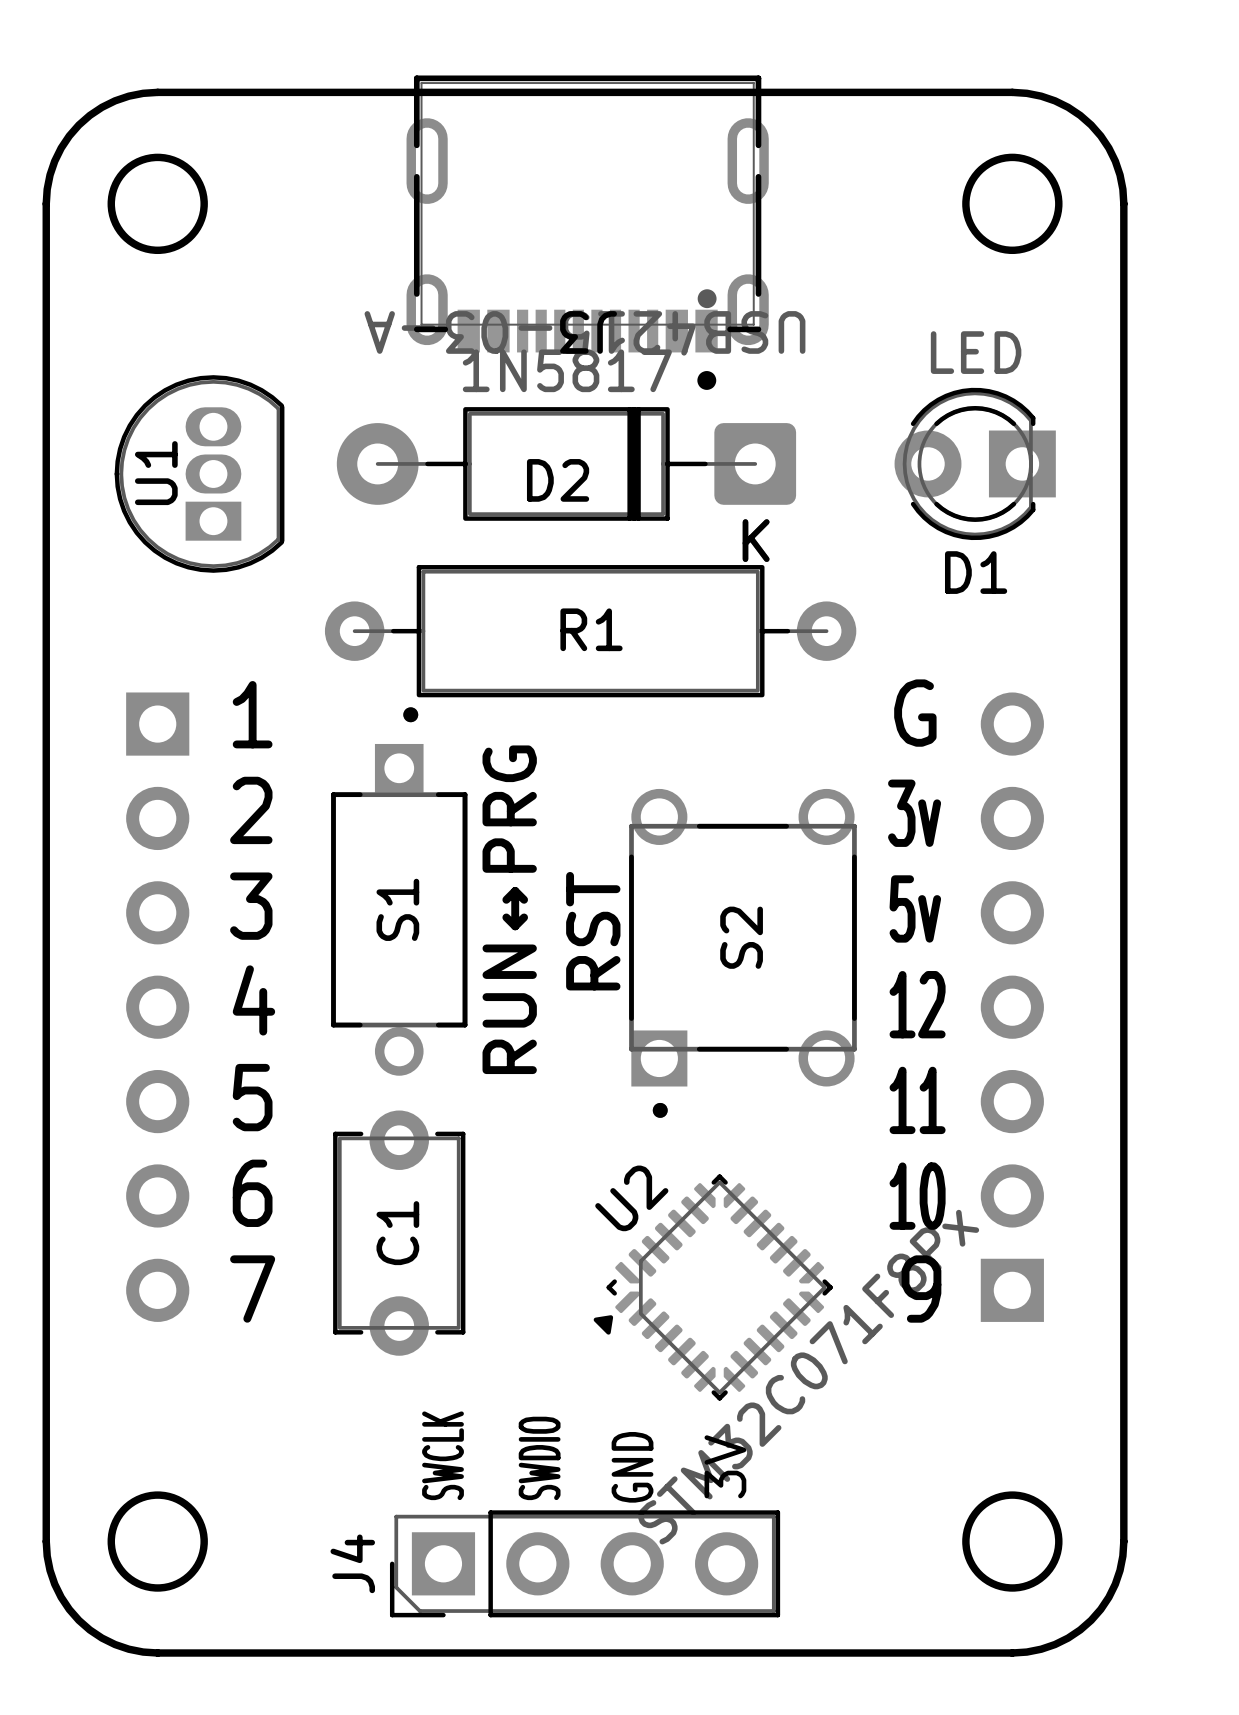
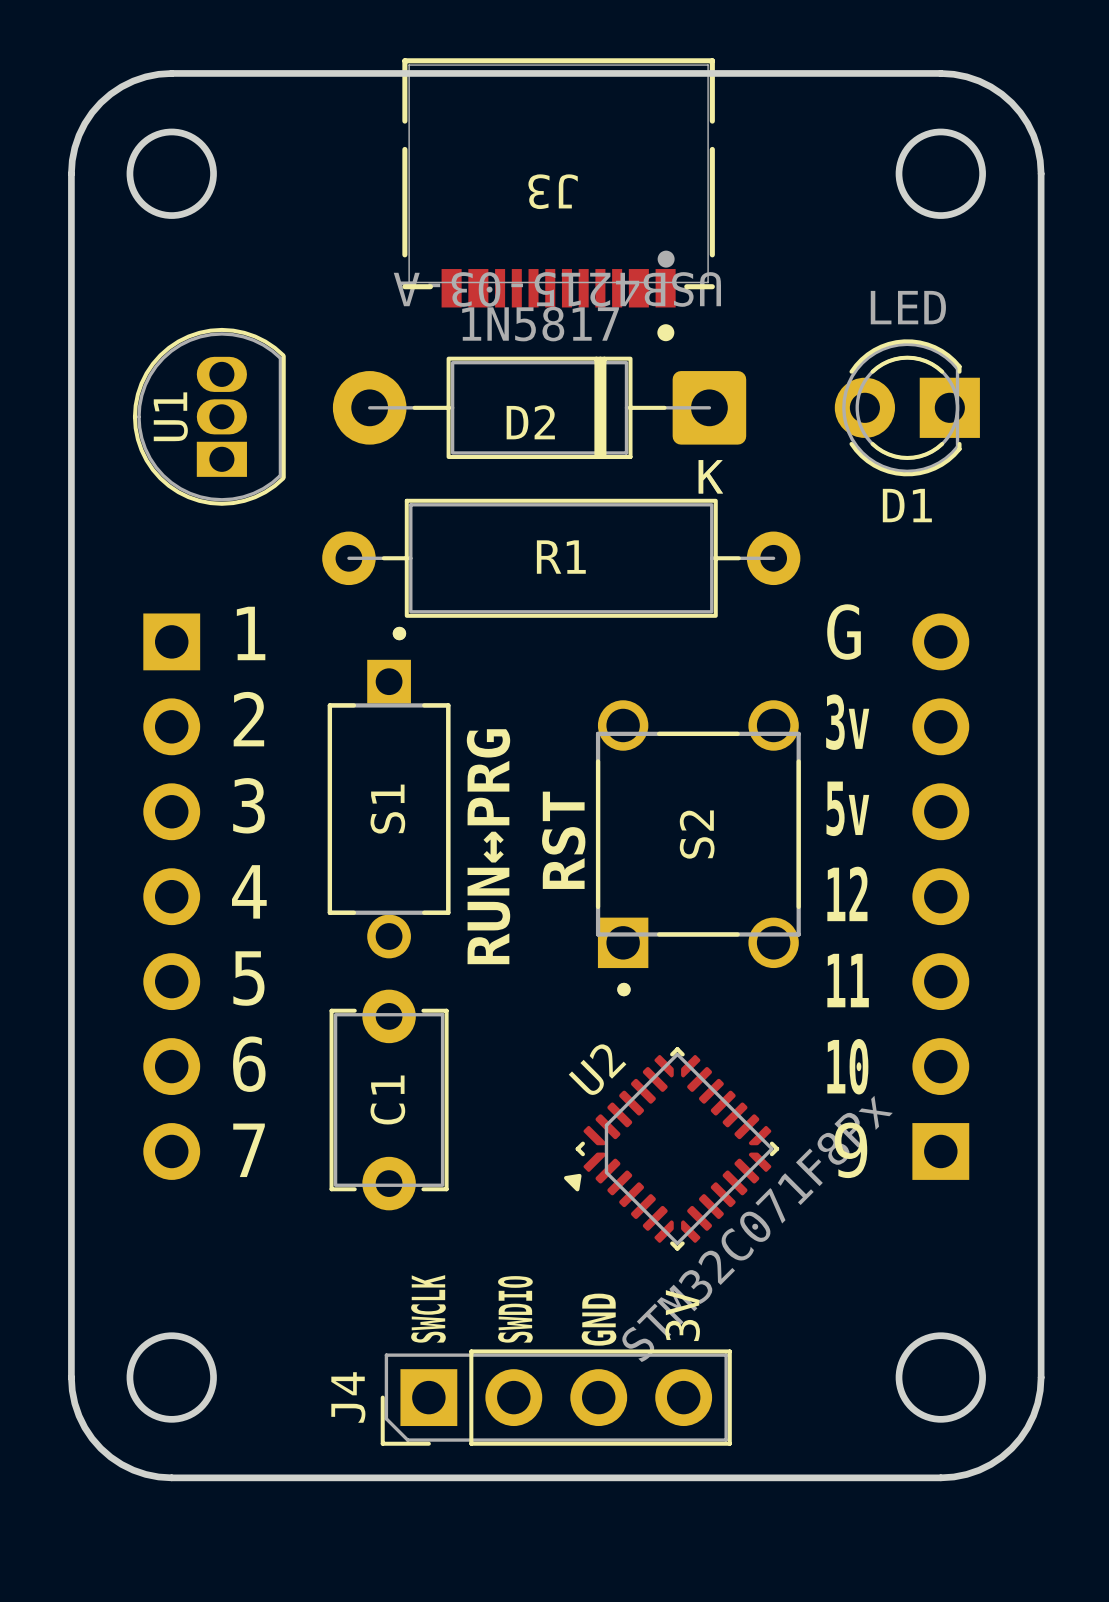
J3 footprint: [406, 75, 769, 390] -> [402, 58, 715, 342]
J3 name position: J3 (588, 332) -> J3 (553, 191)

